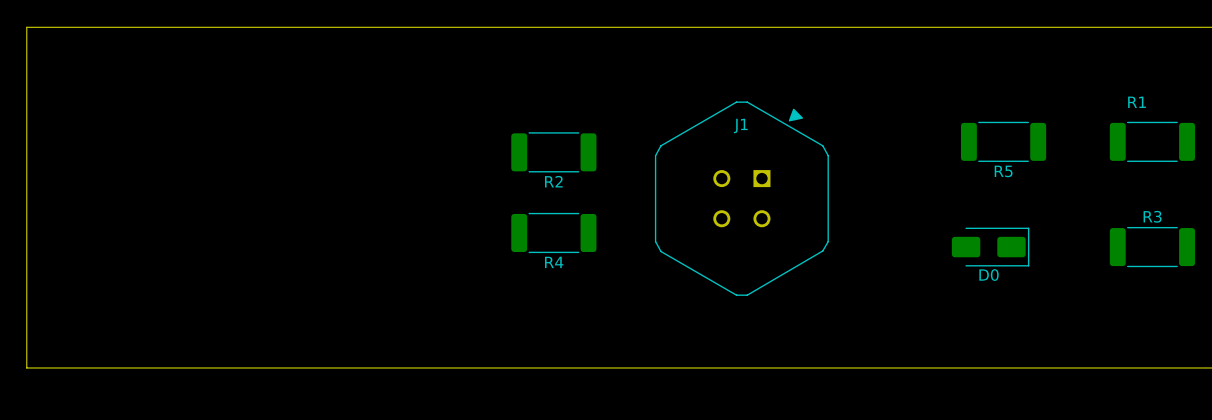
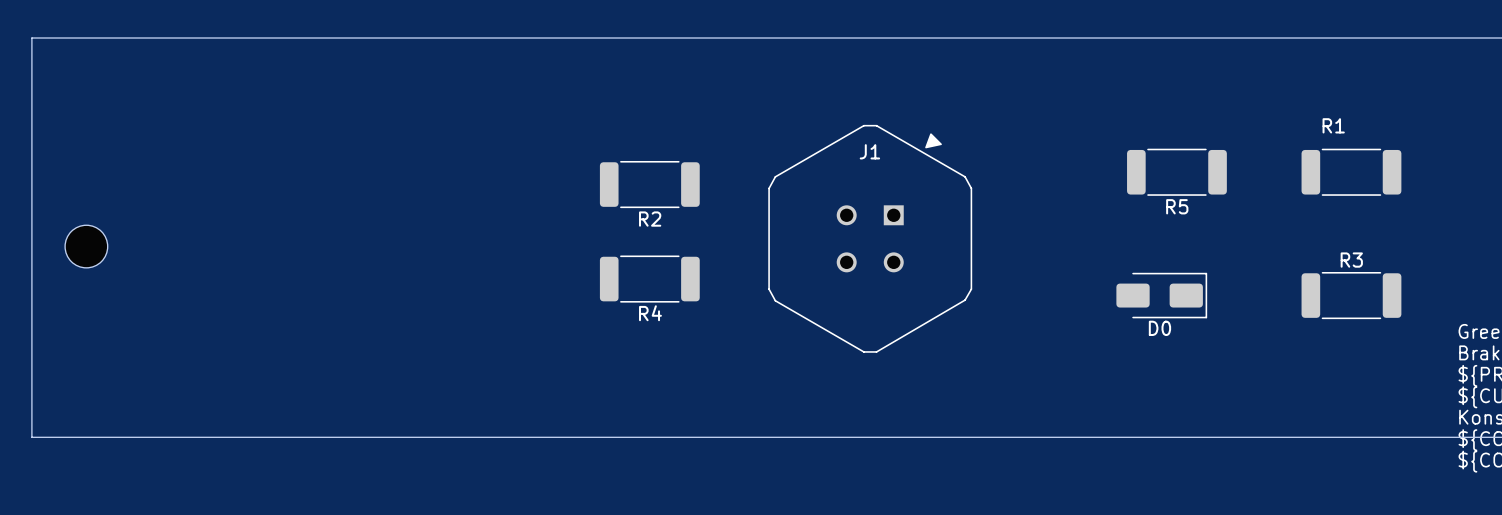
part: none -> (86, 246)

